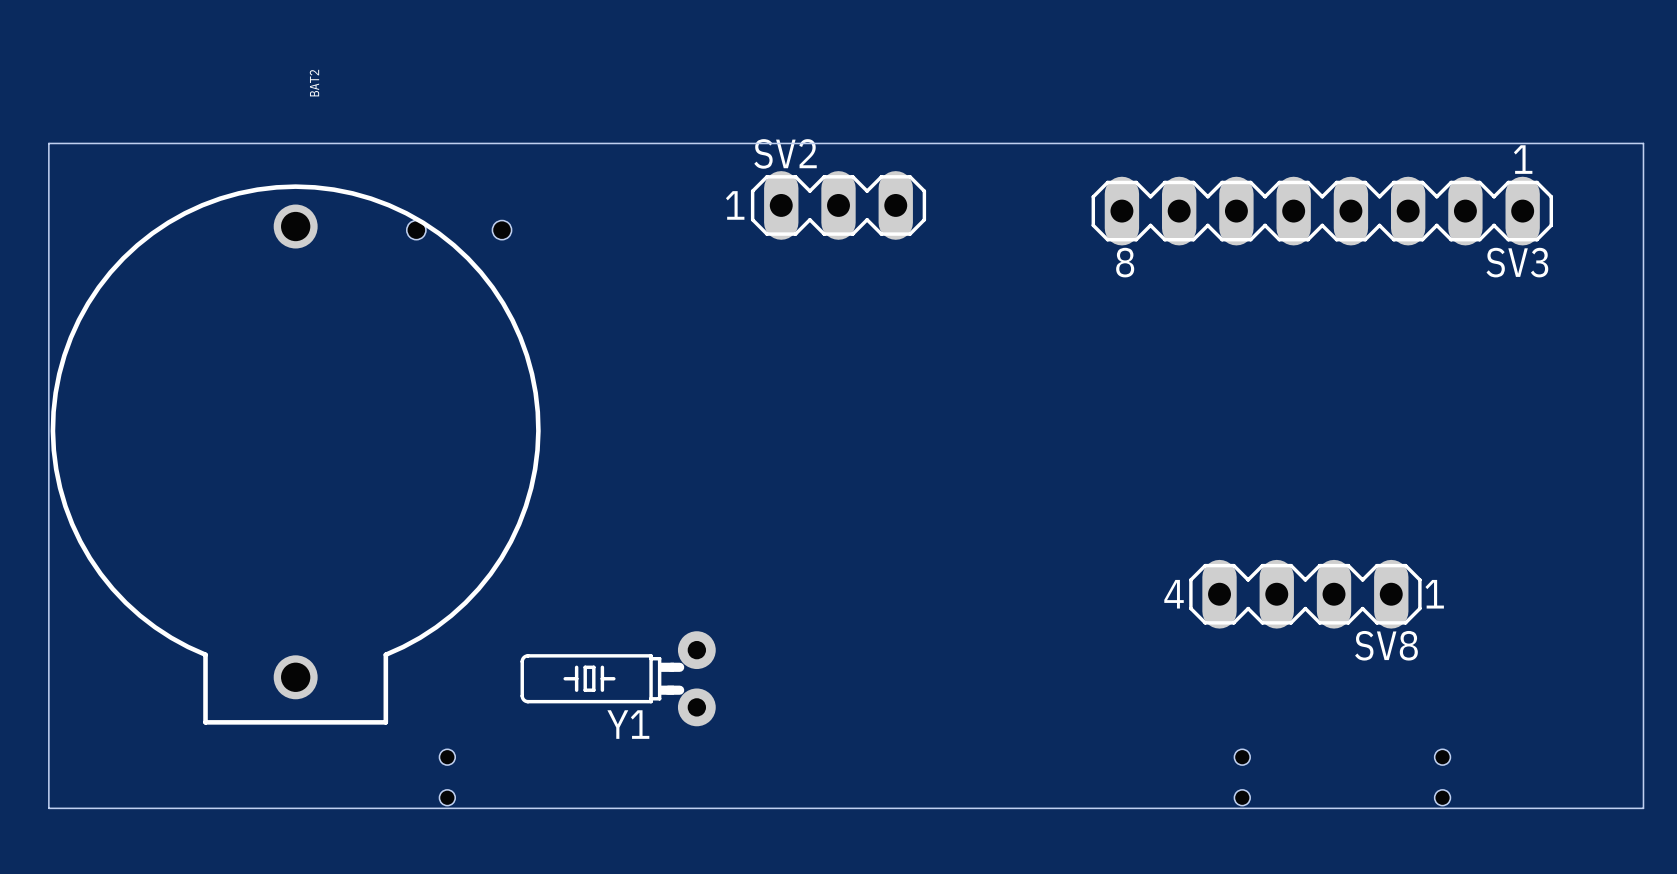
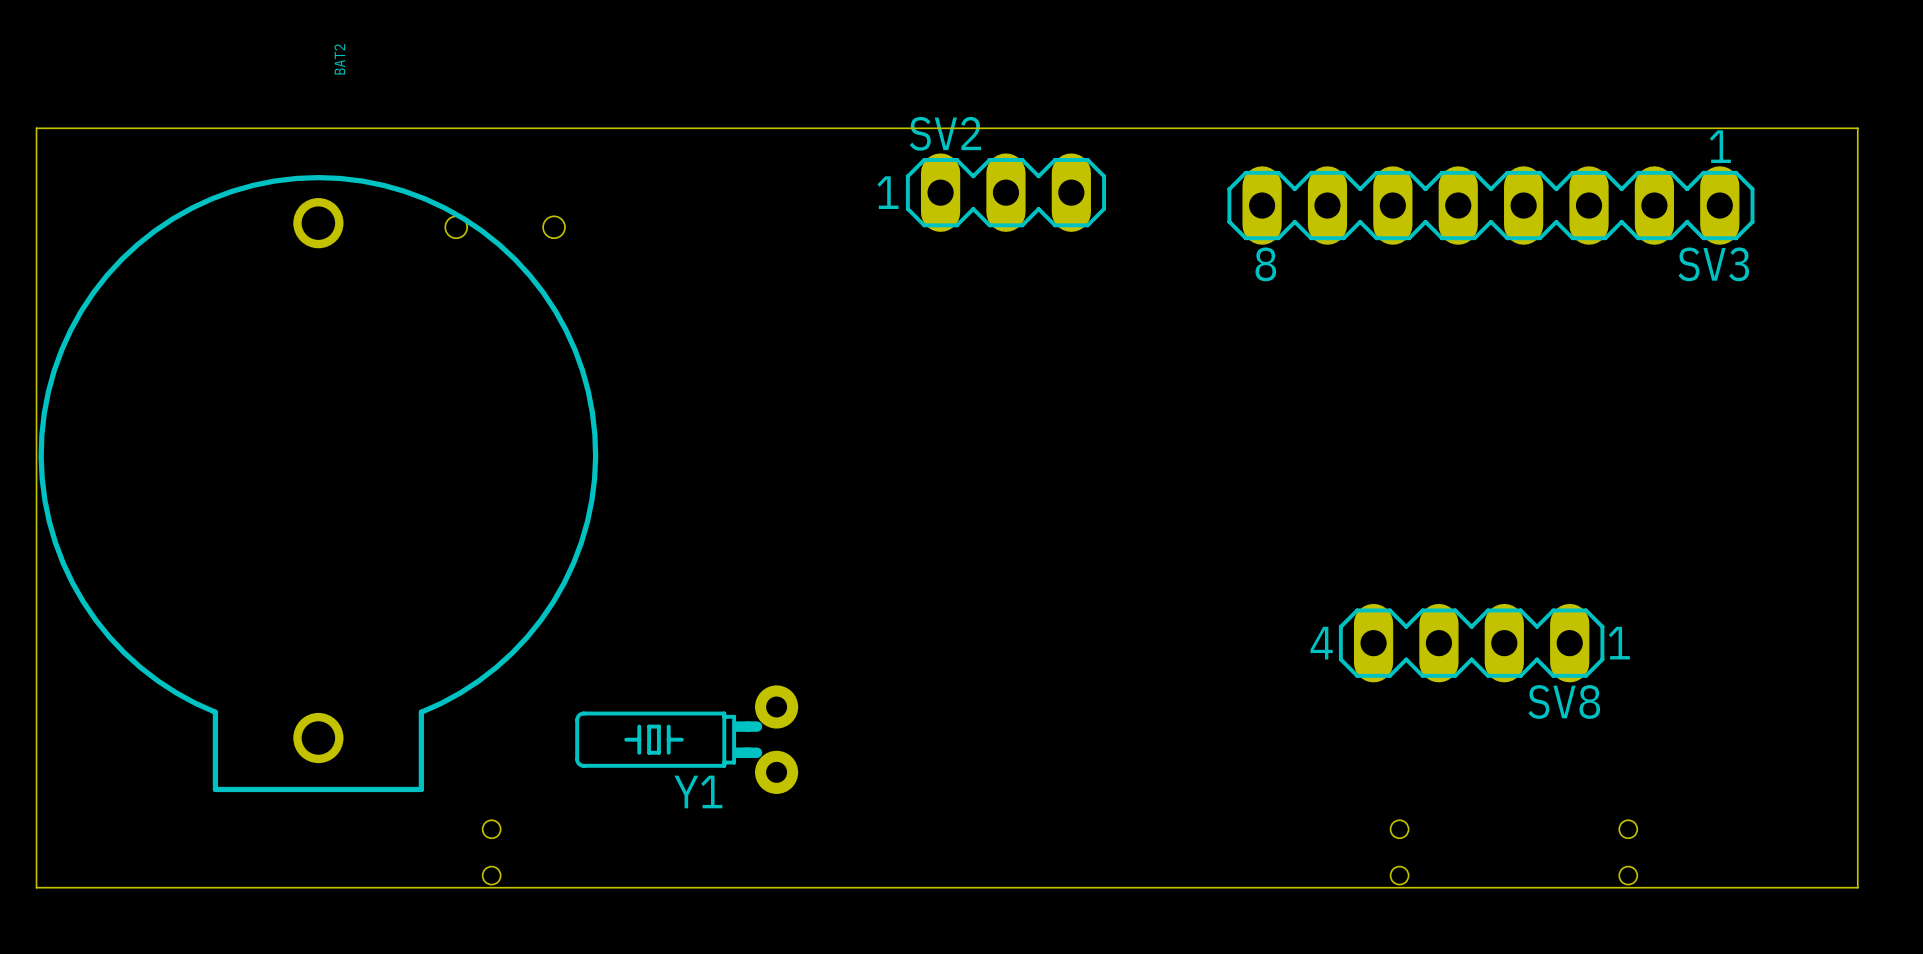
SV2 position: (838, 205) -> (1005, 192)

